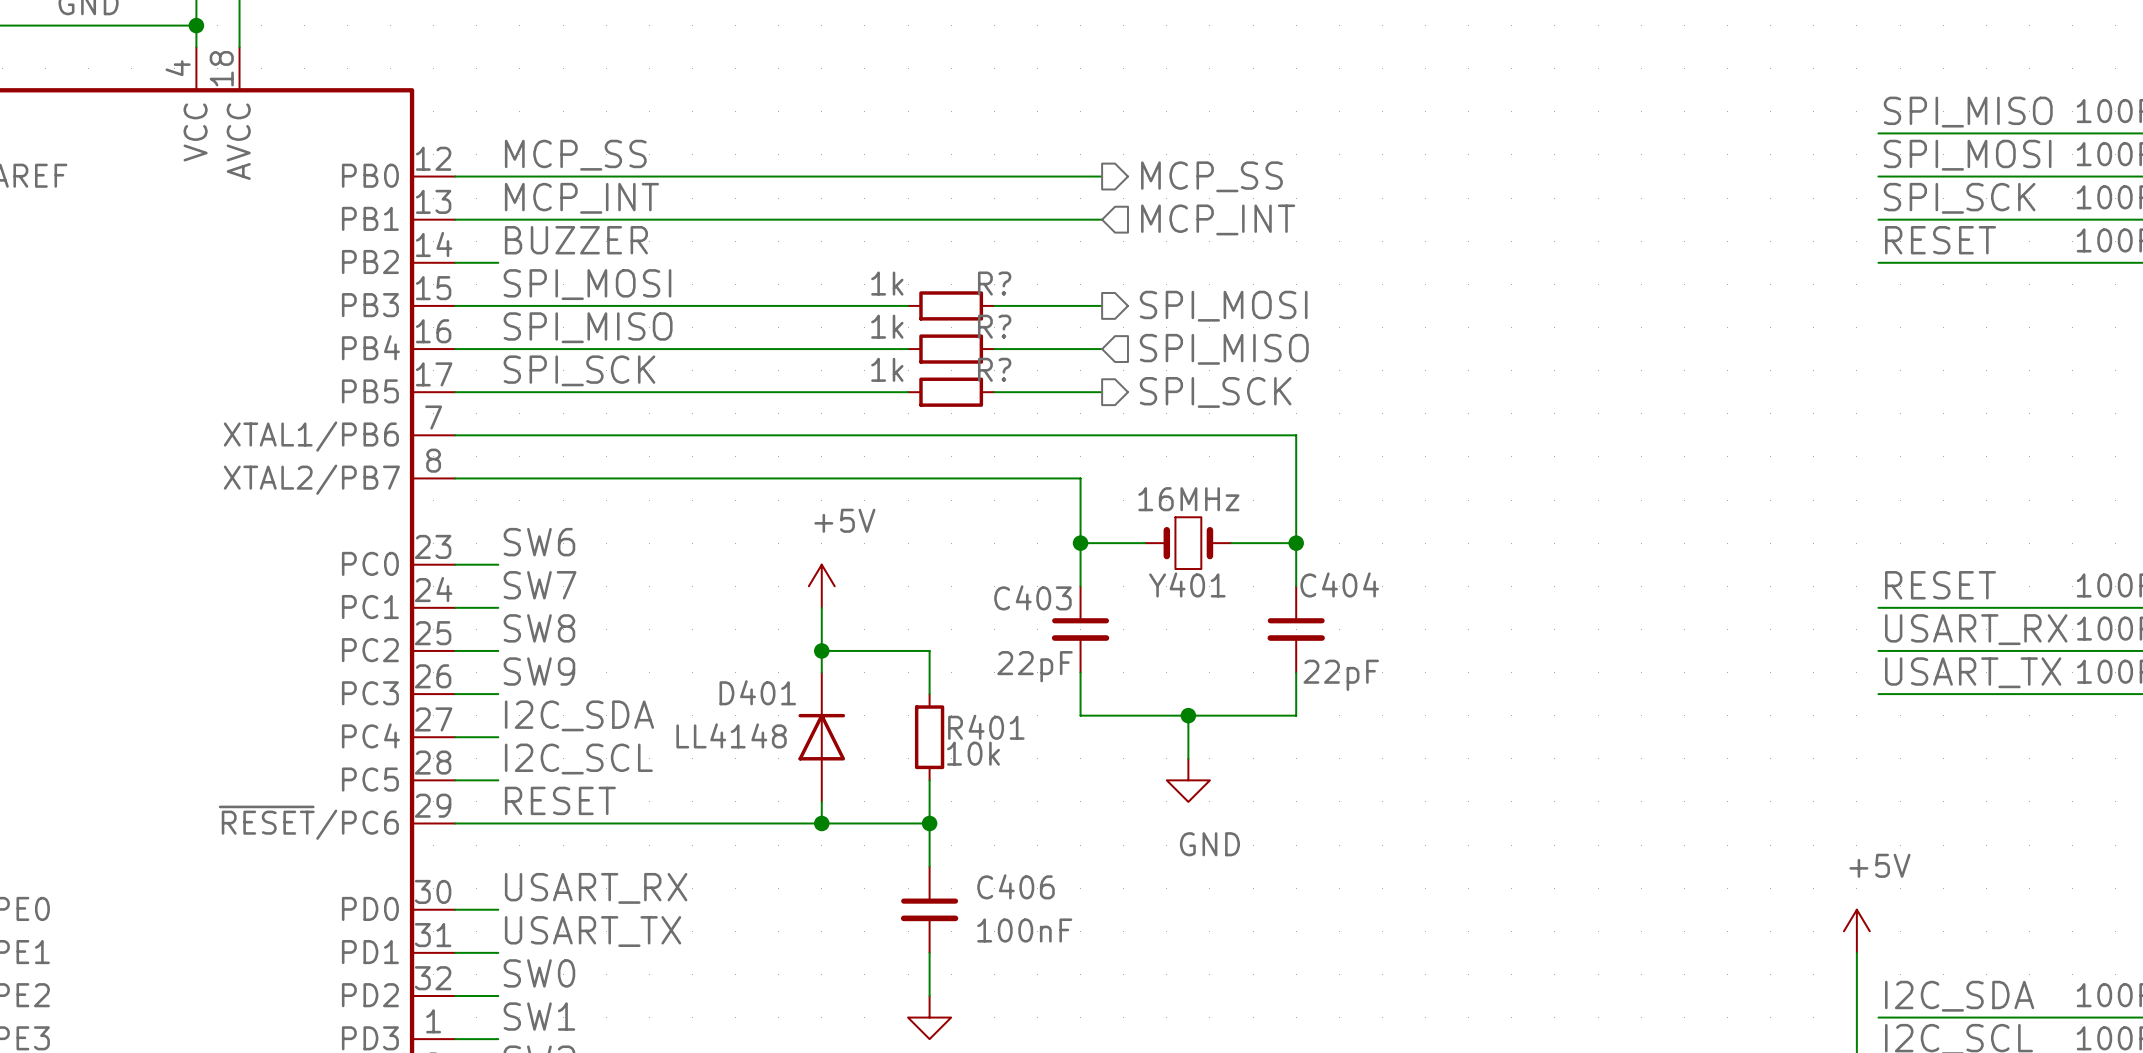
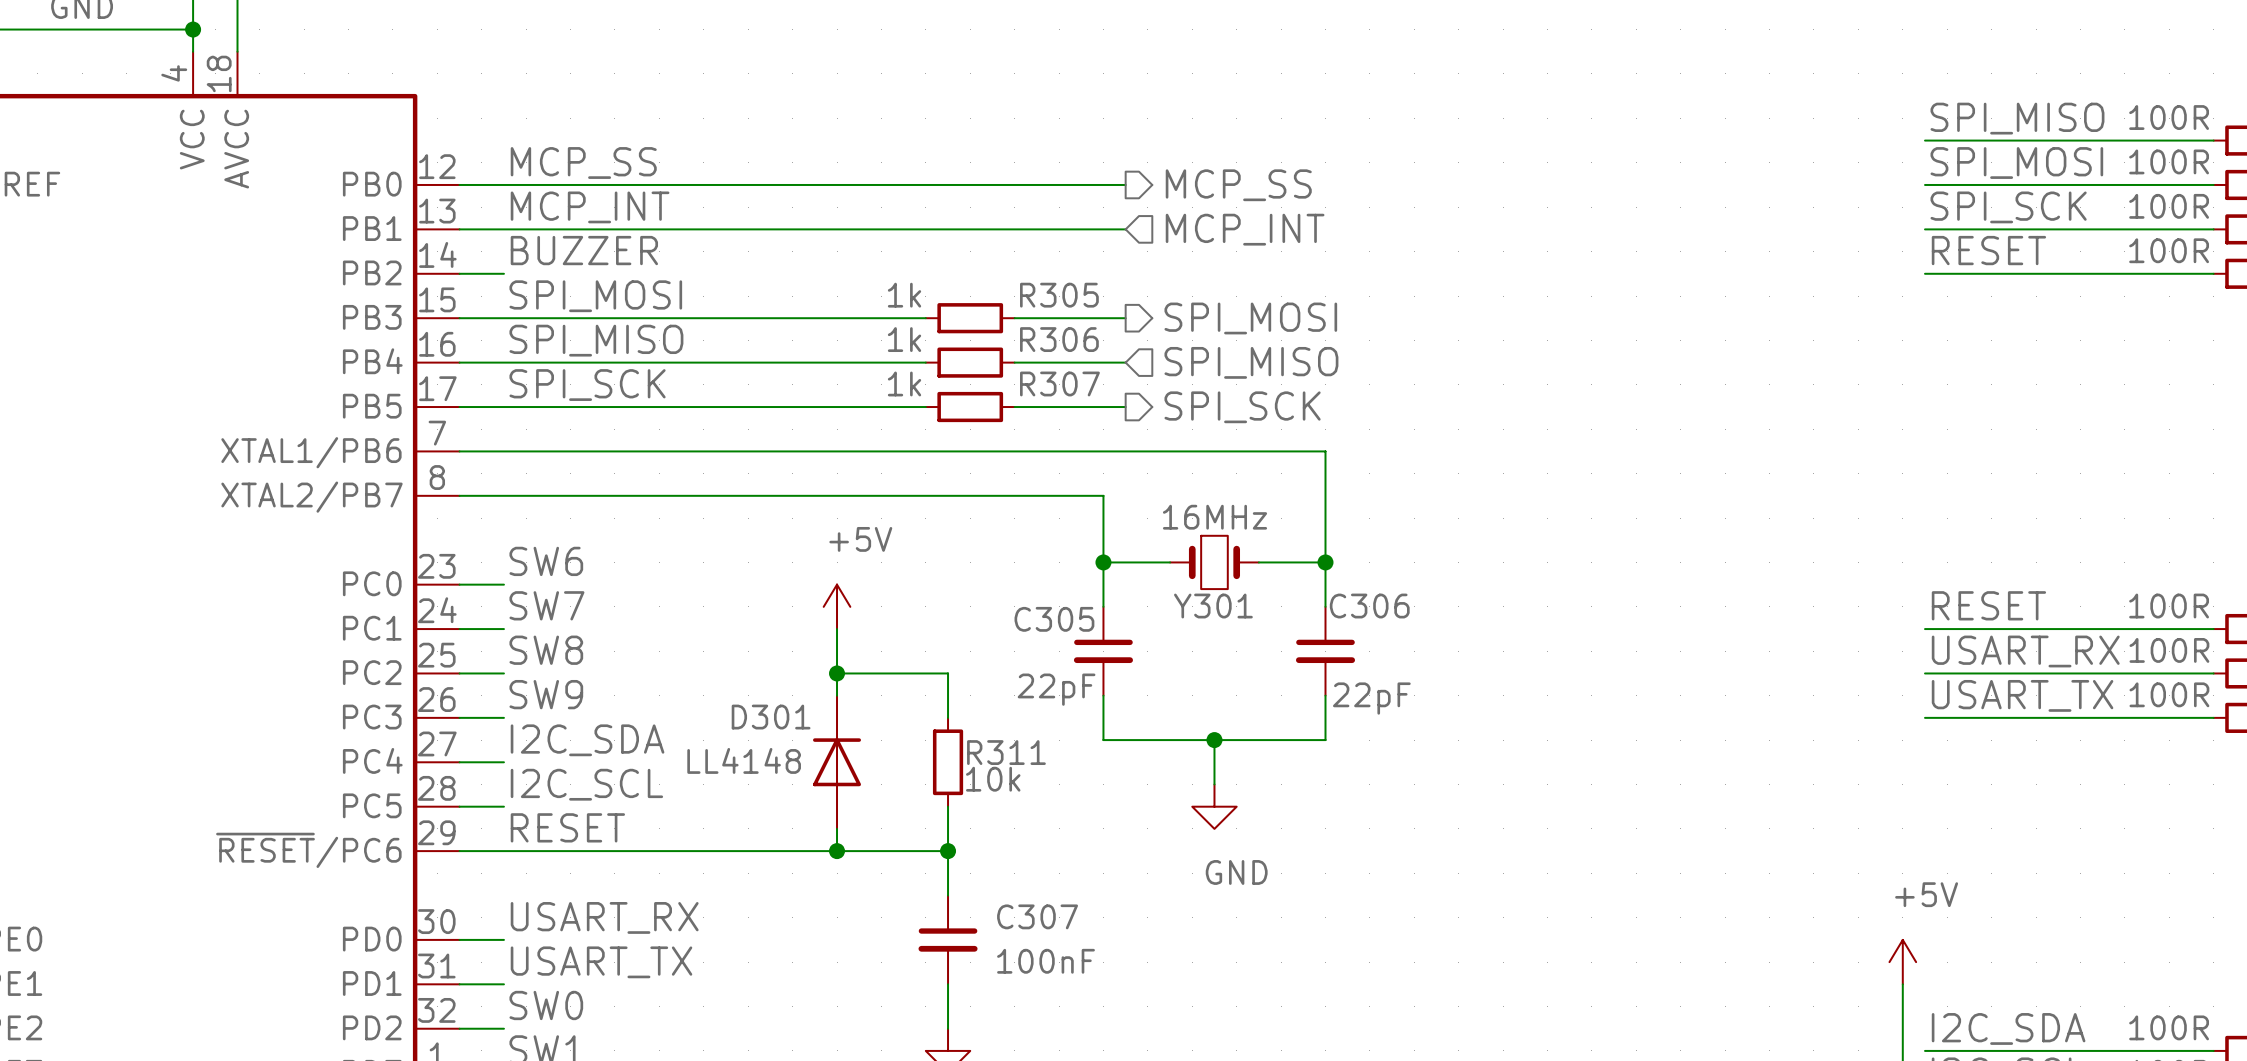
R? name: R? (994, 283) -> R305 (1059, 295)
R? name: R? (994, 326) -> R306 (1059, 339)
R? name: R? (994, 369) -> R307 (1059, 383)
Y401 name: Y401 (1187, 584) -> Y301 (1213, 606)
C404 name: C404 (1339, 584) -> C306 (1369, 606)
C403 name: C403 (1032, 597) -> C305 (1054, 619)
D401 name: D401 (757, 692) -> D301 (771, 717)
R401 name: R401 (986, 727) -> R311 (1006, 752)
C406 name: C406 (1016, 886) -> C307 (1037, 916)

